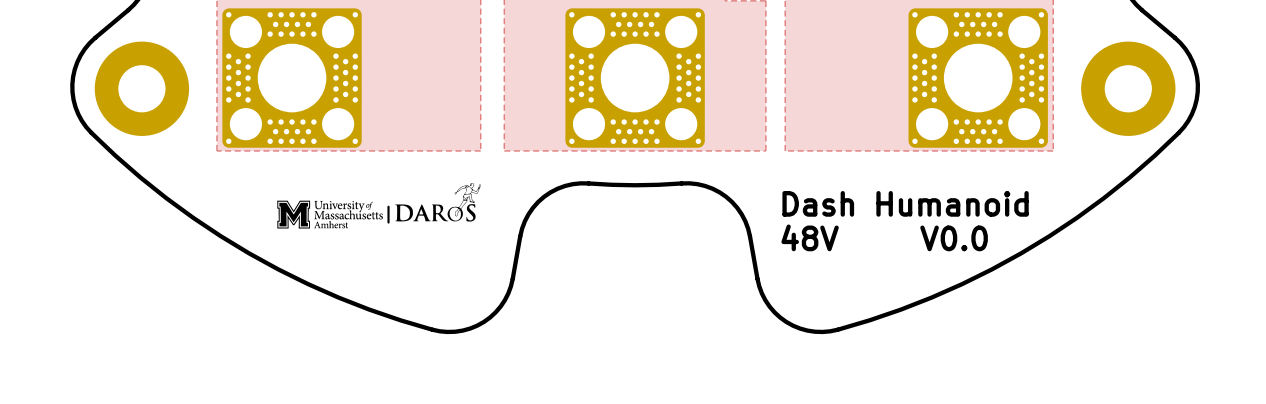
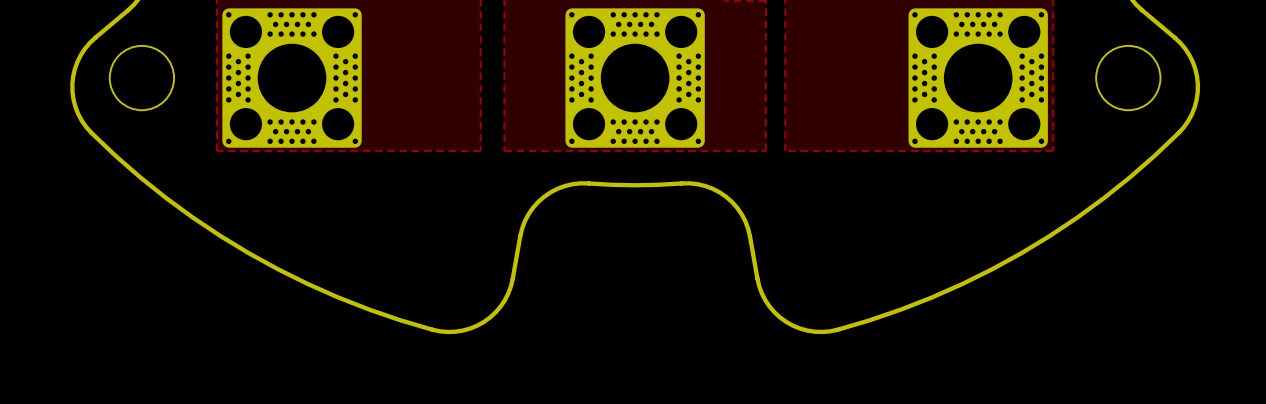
round board edge: none -> [109, 45, 175, 111]
round board edge: none -> [1095, 45, 1162, 111]
part: (141, 88) -> none
part: (1128, 88) -> none
drawing: [277, 183, 481, 229] -> none
text: Dash Humanoid (905, 203) -> none
line: (388, 206) (388, 222) -> none
text: 48V V0.0 (884, 237) -> none

